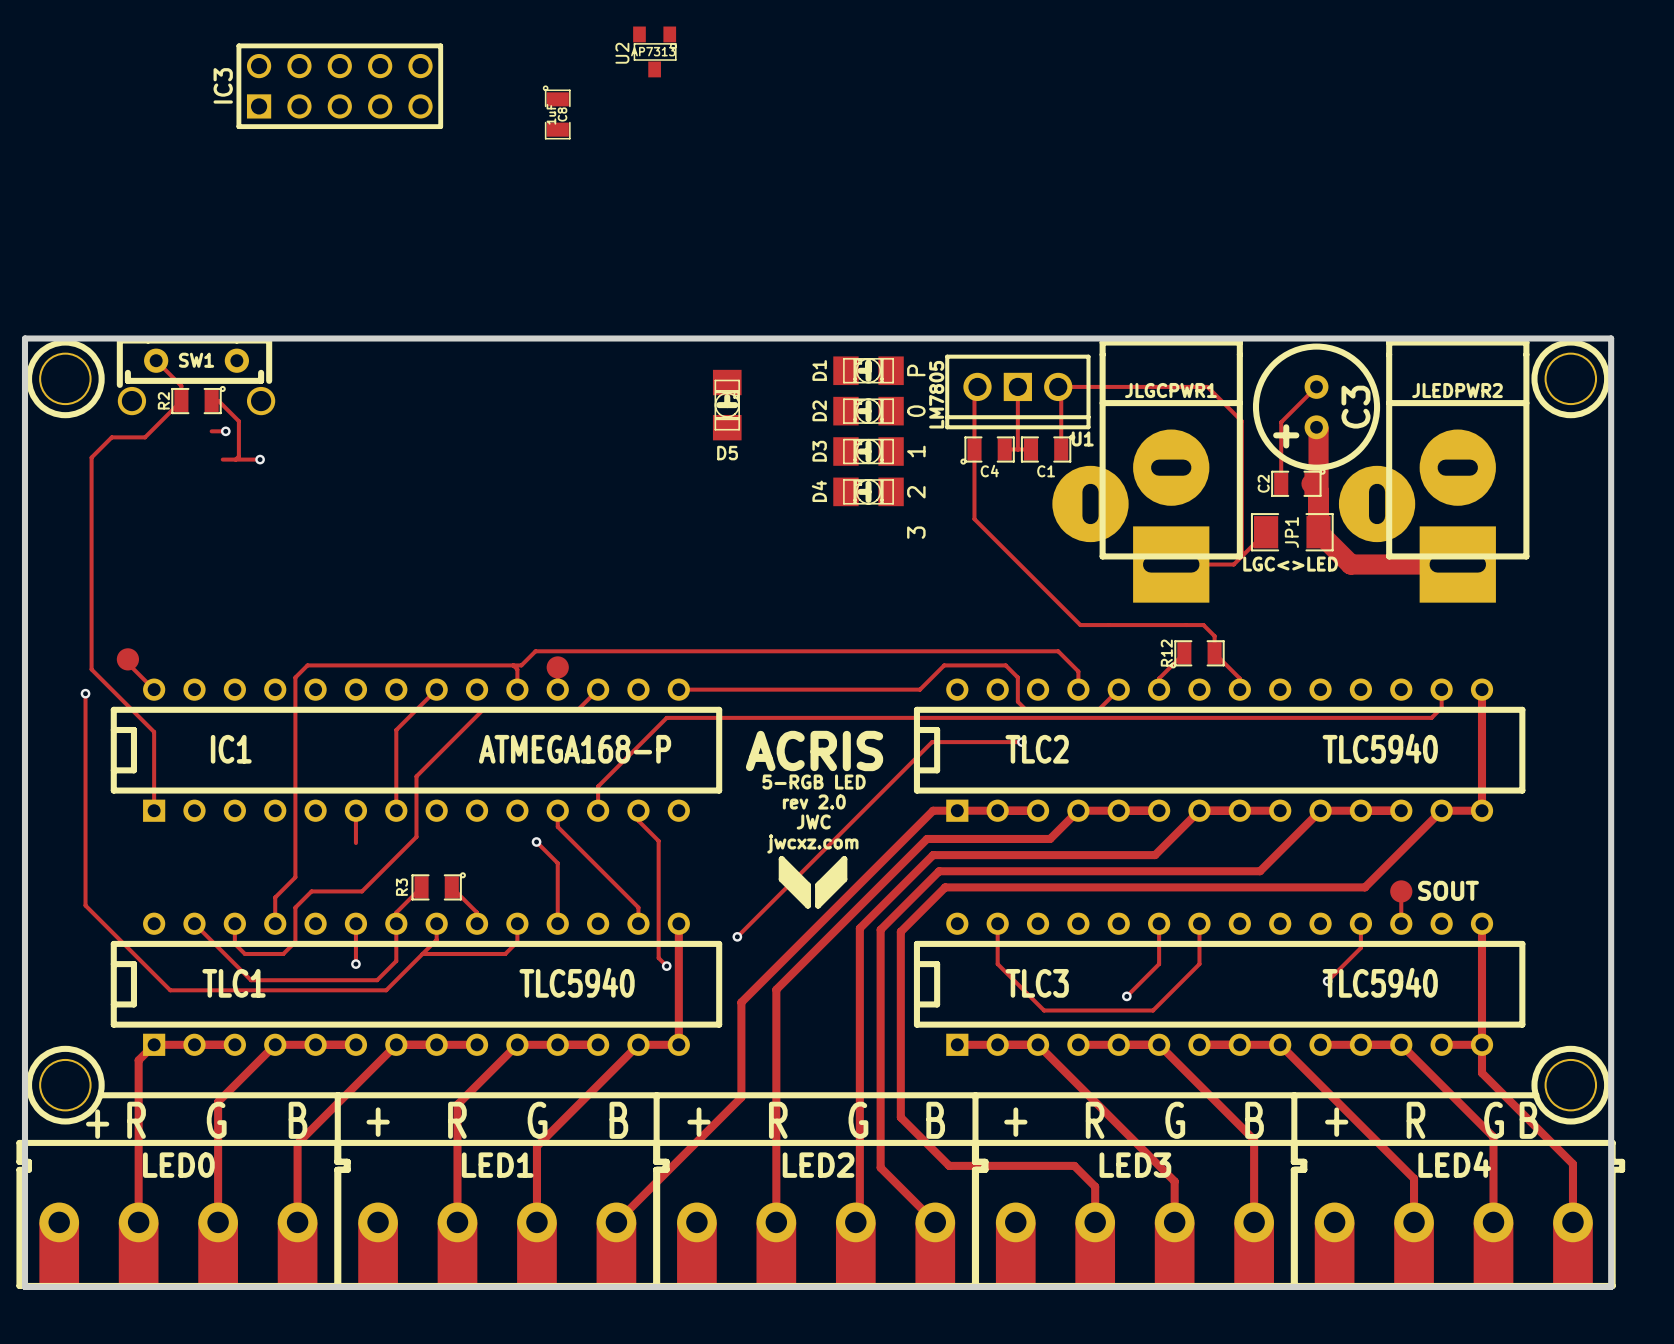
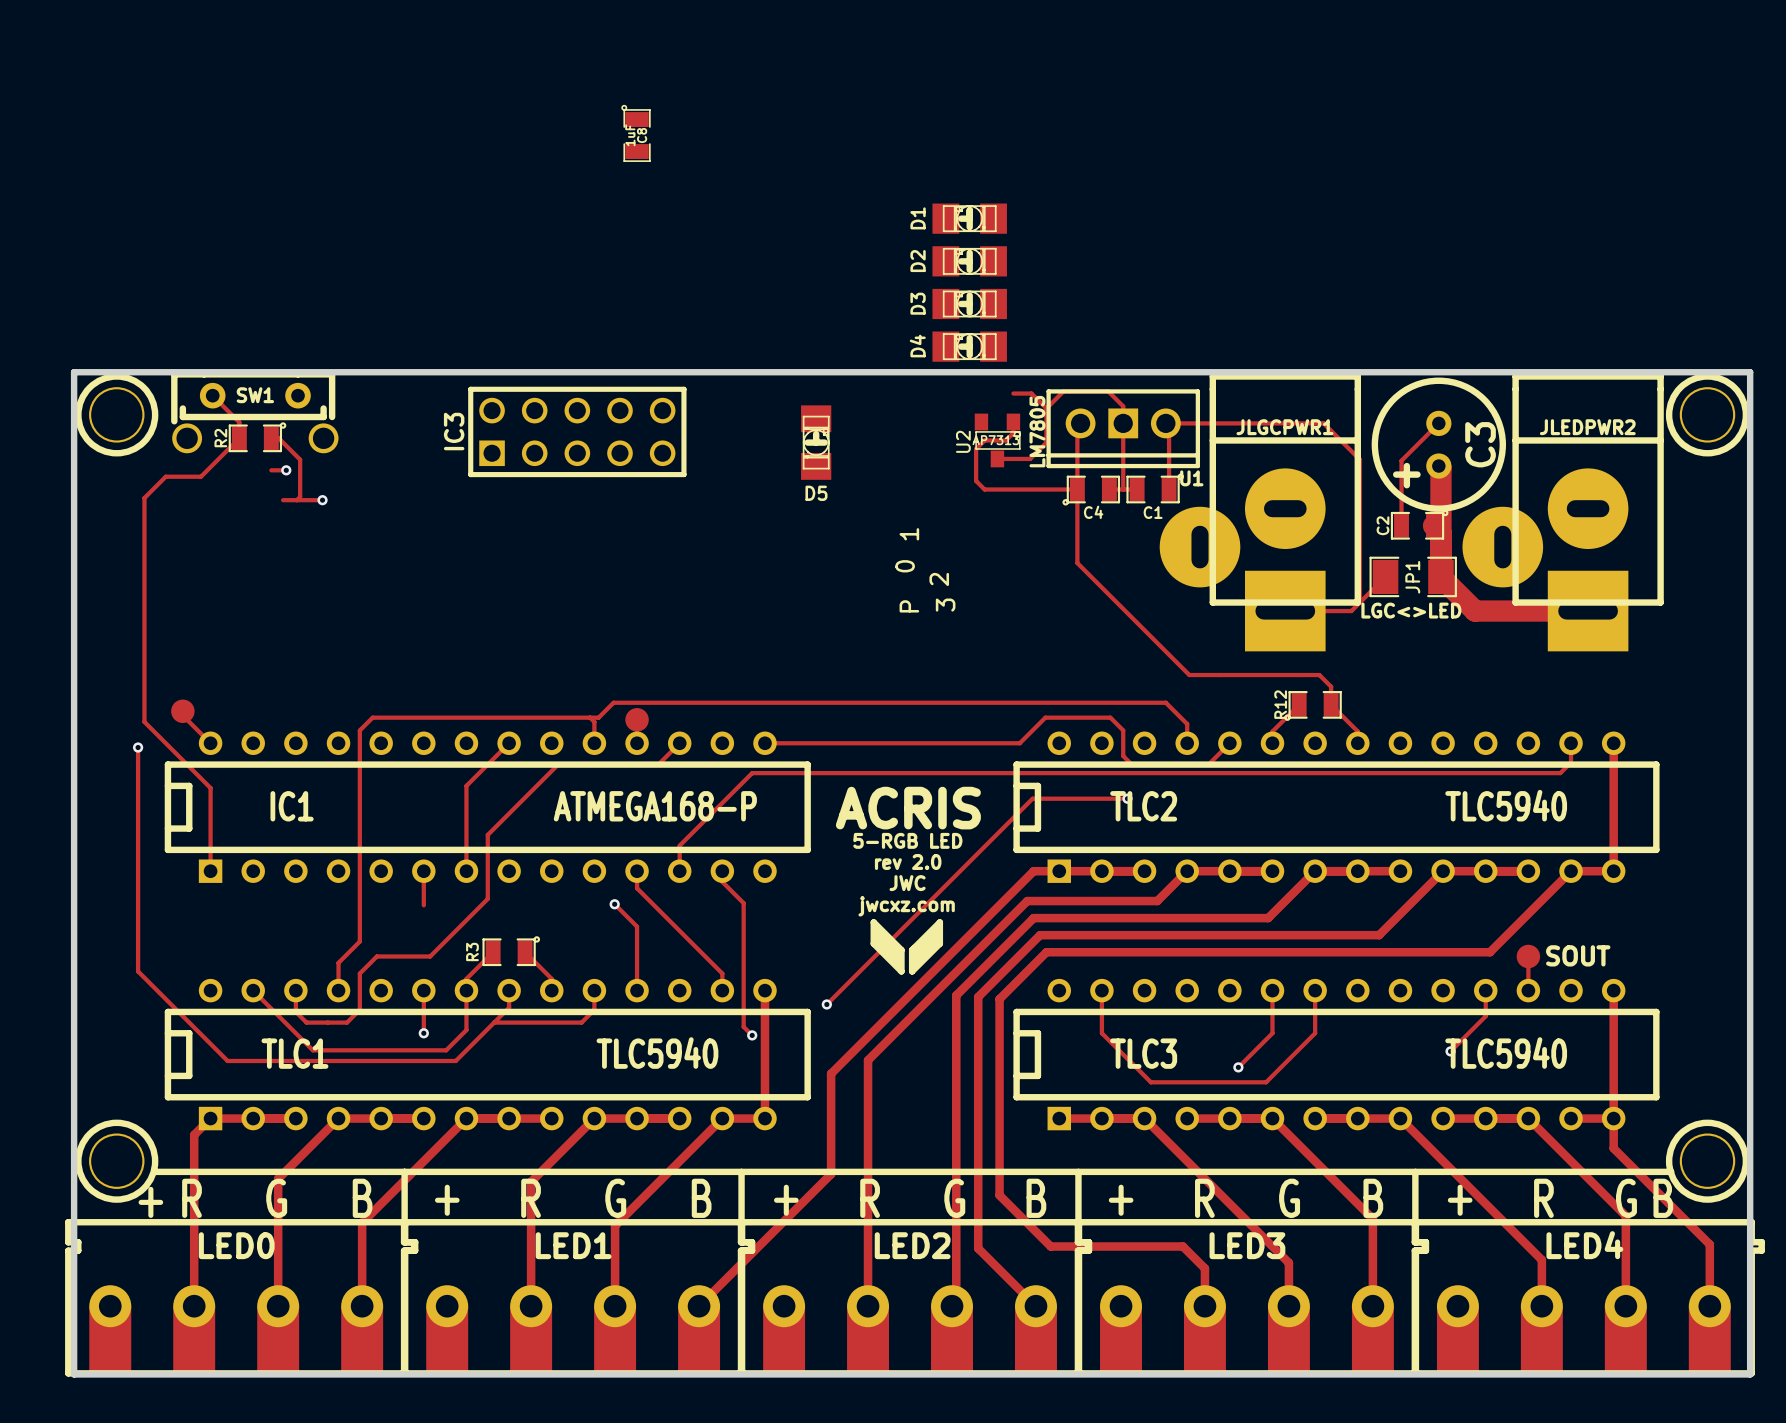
U2 position: (654, 51) -> (997, 440)
IC3 position: (339, 86) -> (577, 431)
track: none -> (1013, 393) (1031, 393) (1046, 408)
line: (868, 362) (868, 378) -> (969, 210) (969, 227)
line: (860, 370) (868, 370) -> (961, 218) (969, 218)
D1 position: (868, 370) -> (969, 218)
text position: P (916, 370) -> P (909, 606)
track: none -> (1046, 408) (1046, 442) (1030, 458) (997, 458)
track: none -> (1046, 408) (1063, 391) (1108, 391) (1123, 406) (1123, 423)
track: none -> (1013, 422) (1013, 433) (1005, 440) (984, 440) (976, 448) (976, 480) (984, 489) (1077, 489)
line: (868, 403) (868, 419) -> (969, 252) (969, 269)
line: (860, 411) (868, 411) -> (961, 261) (969, 261)
D2 position: (868, 411) -> (969, 261)
text position: 0 (916, 411) -> 0 (905, 566)
line: (868, 443) (868, 459) -> (969, 295) (969, 312)
line: (860, 451) (868, 451) -> (961, 303) (969, 303)
D3 position: (868, 451) -> (969, 303)
text position: 1 (916, 451) -> 1 (909, 534)
line: (868, 483) (868, 499) -> (969, 338) (969, 355)
line: (860, 491) (868, 491) -> (961, 346) (969, 346)
D4 position: (868, 491) -> (969, 346)
text position: 2 (916, 492) -> 2 (939, 579)
text position: 3 (916, 532) -> 3 (945, 605)

